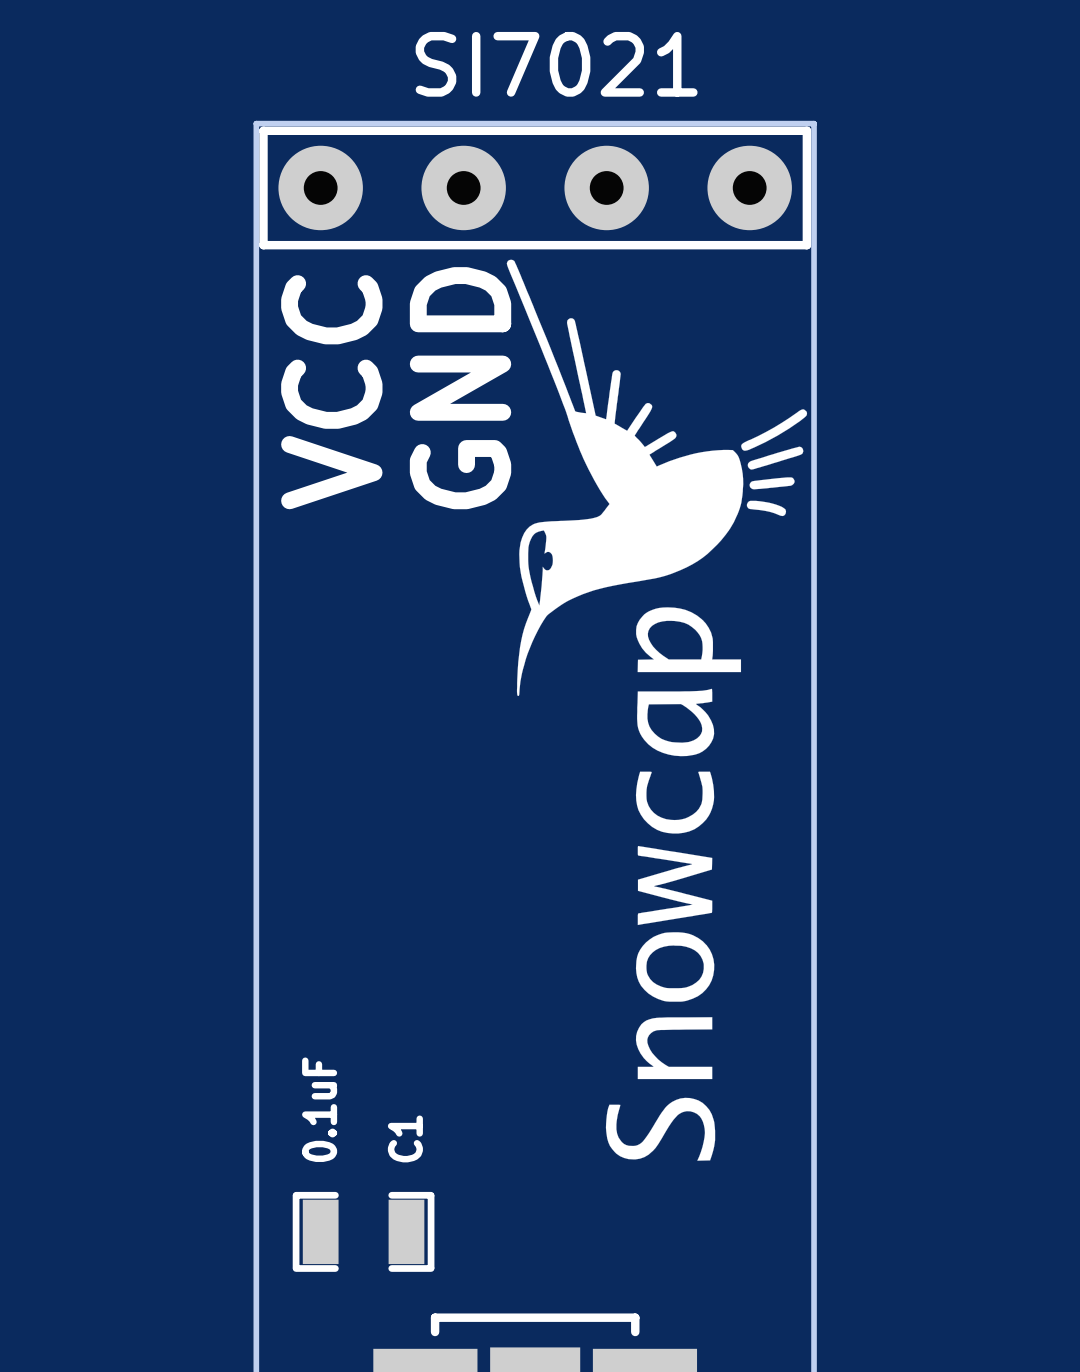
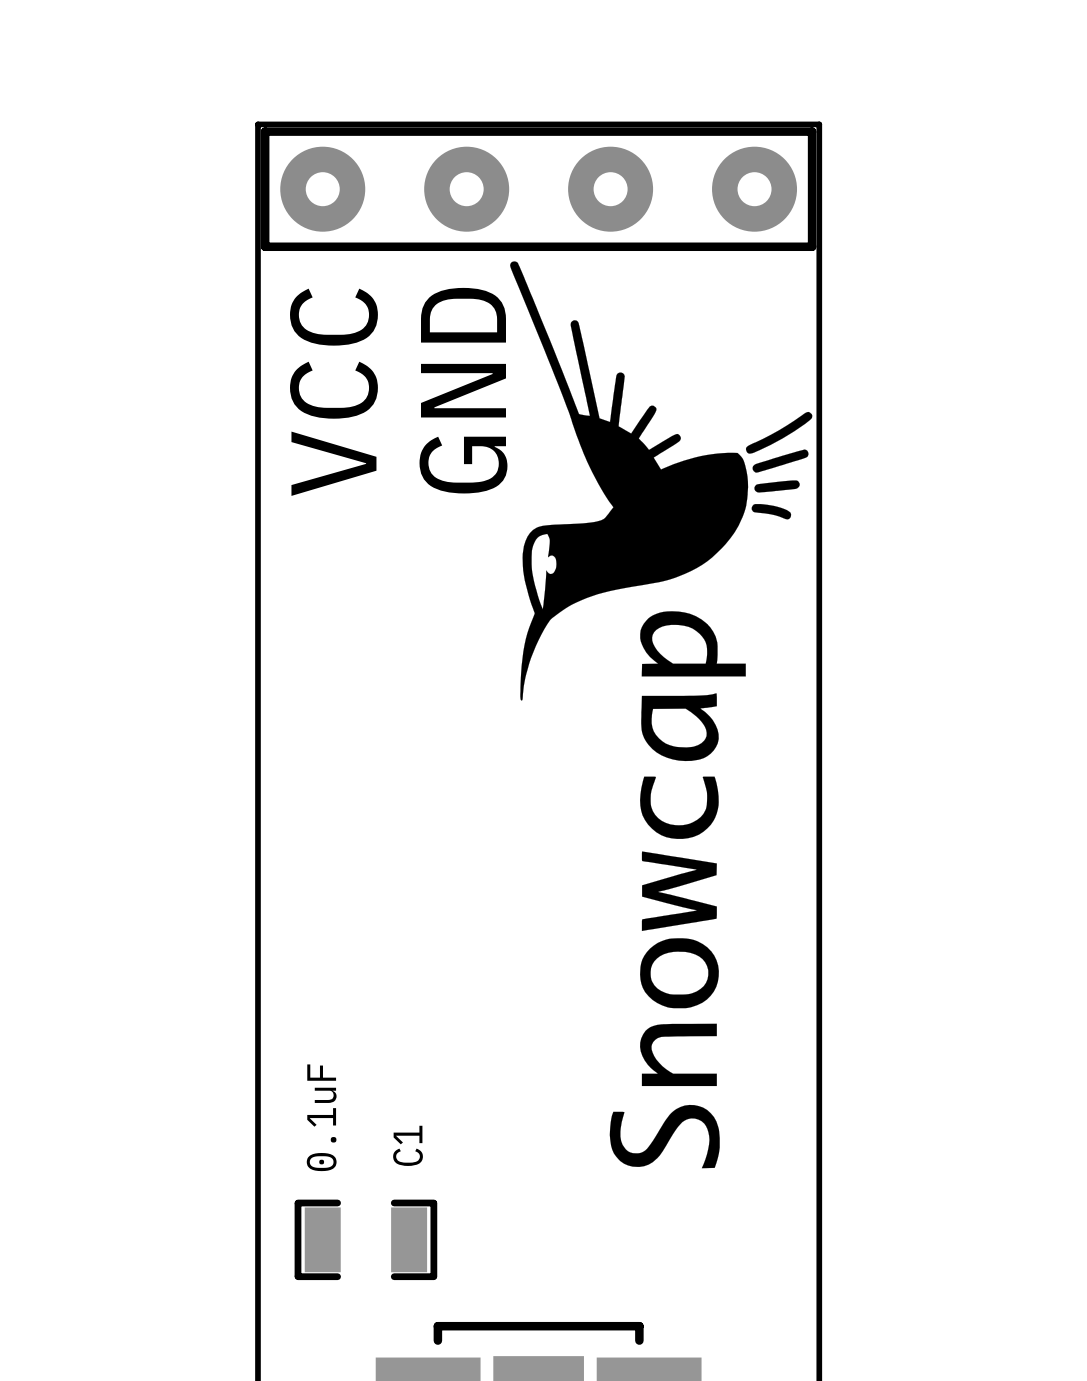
part value: SI7021 (556, 64) -> none

